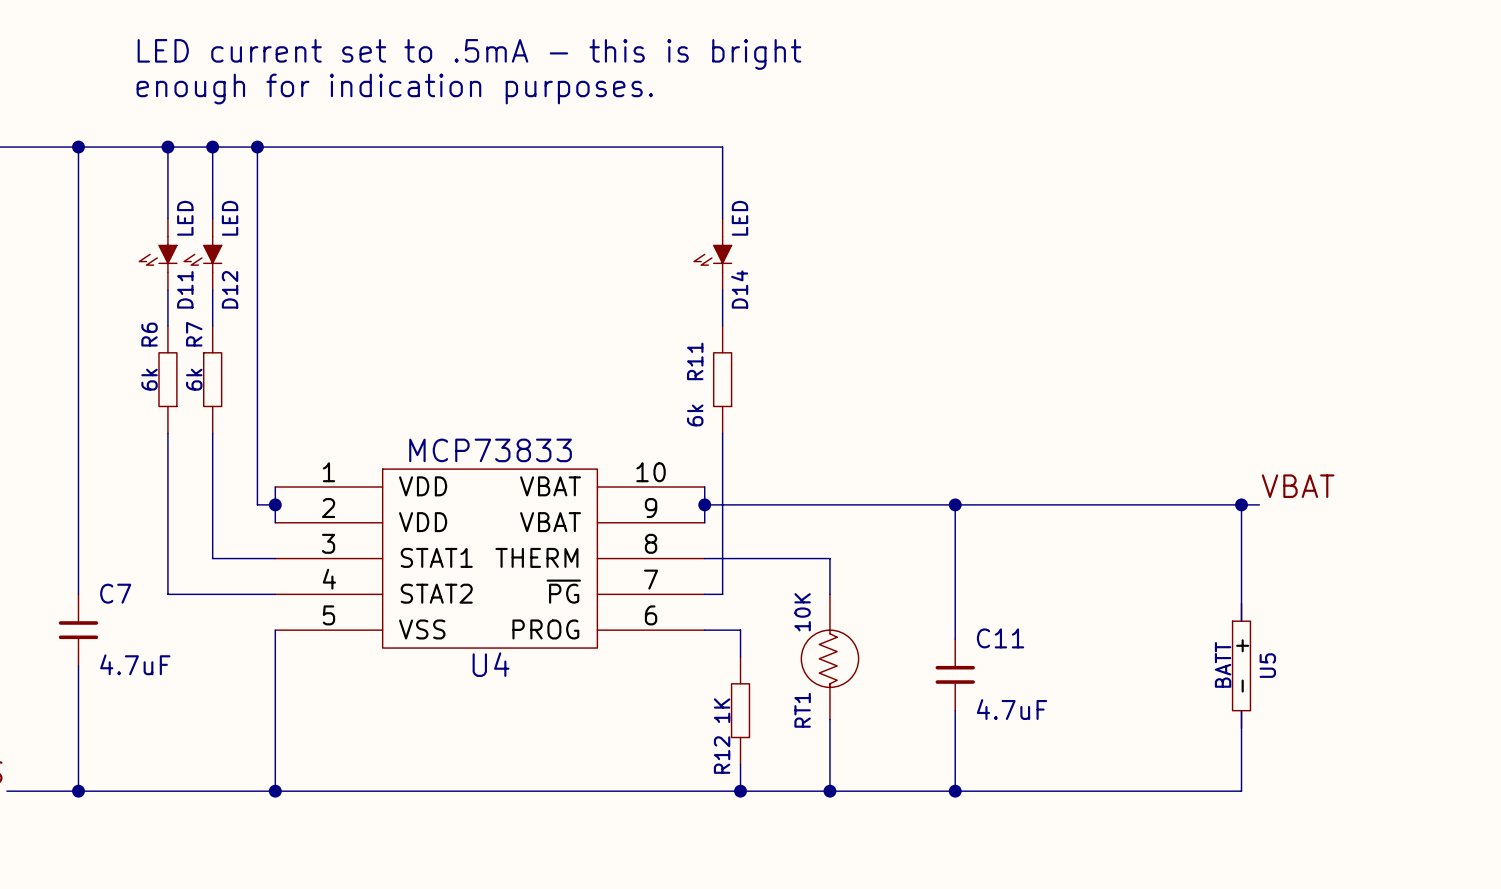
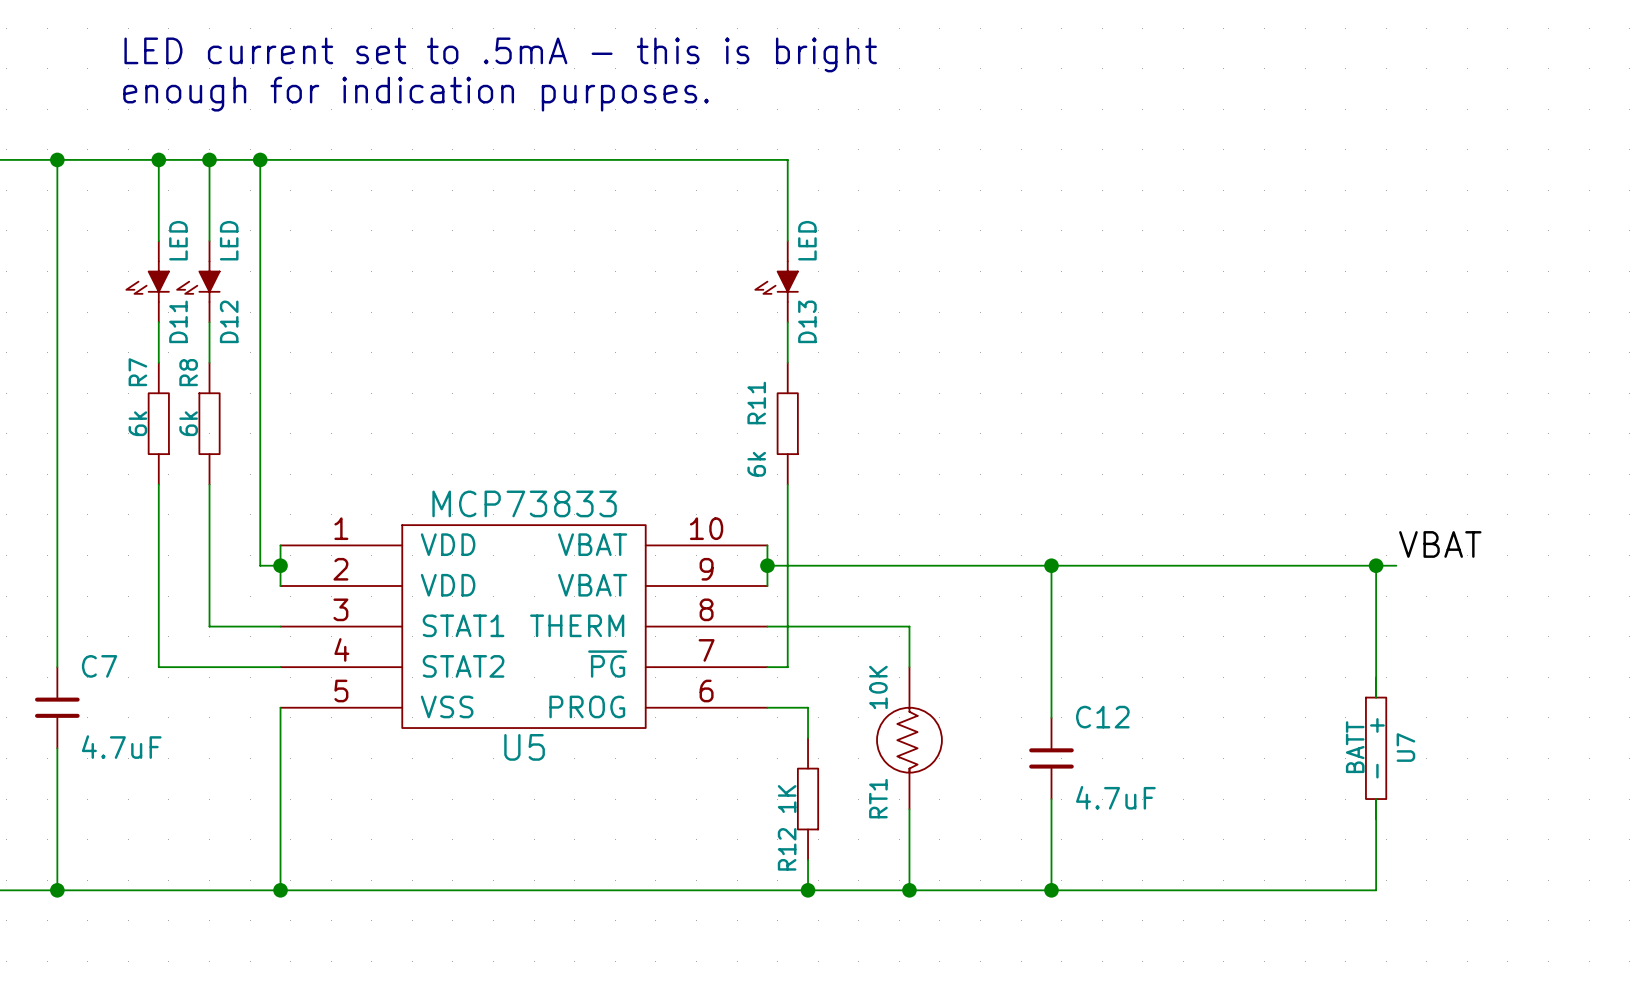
D14 name: D14 (739, 289) -> D13 (807, 321)
R6 name: R6 (149, 334) -> R7 (137, 372)
R7 name: R7 (194, 334) -> R8 (188, 372)
C11 name: C11 (1000, 638) -> C12 (1102, 717)
U4 name: U4 (491, 664) -> U5 (524, 747)
U5 name: U5 (1267, 665) -> U7 (1405, 747)

